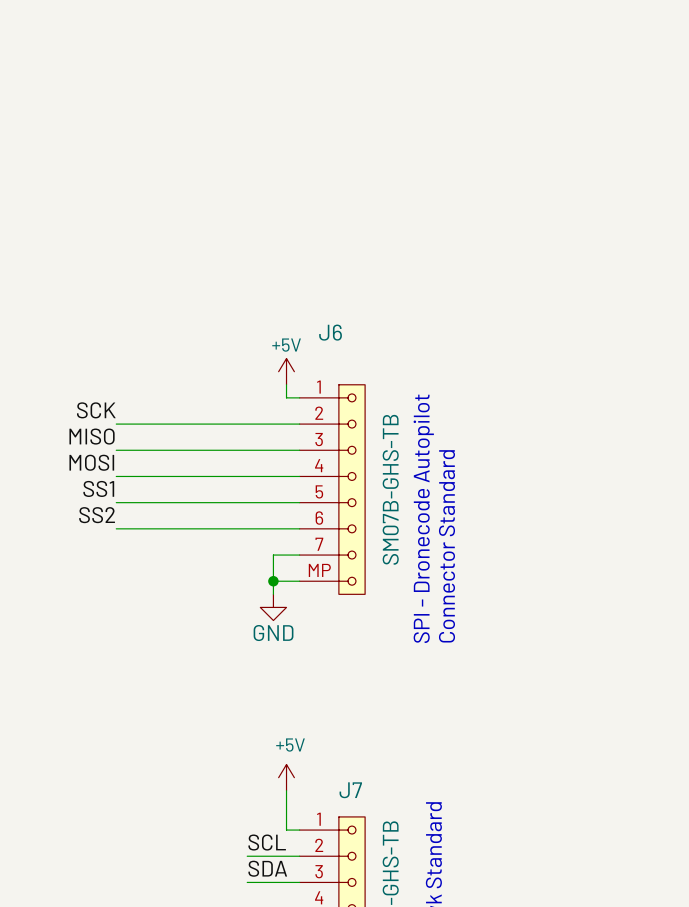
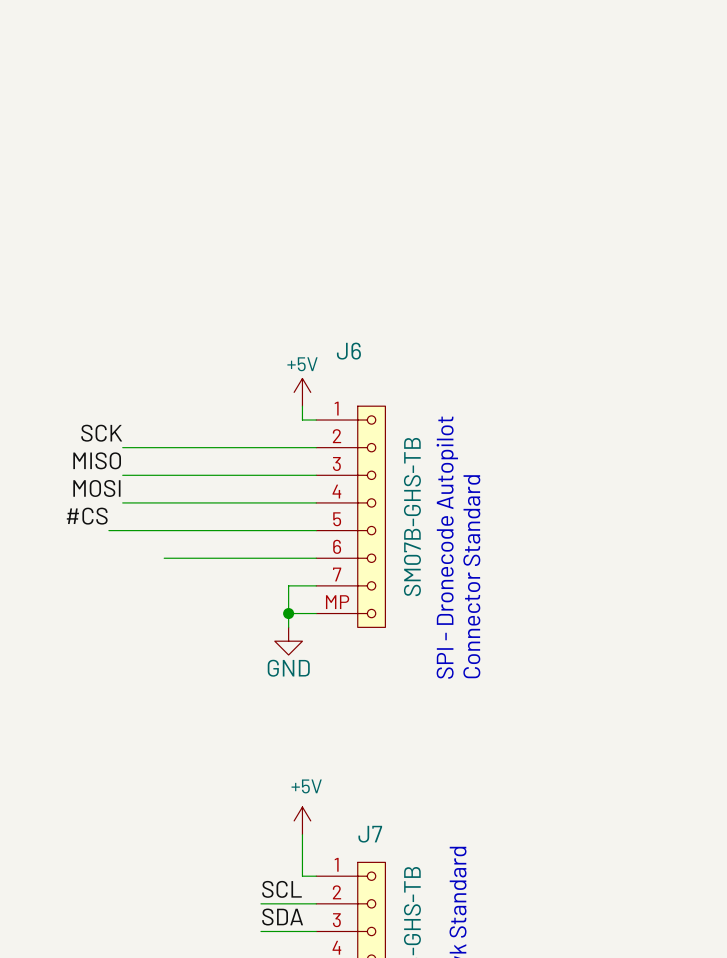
label: none -> #CS (87, 516)
label: SS1 (98, 488) -> none
wire: none -> (108, 530) (122, 530)
label: SS2 (97, 515) -> none
wire: (116, 528) (155, 528) -> none

